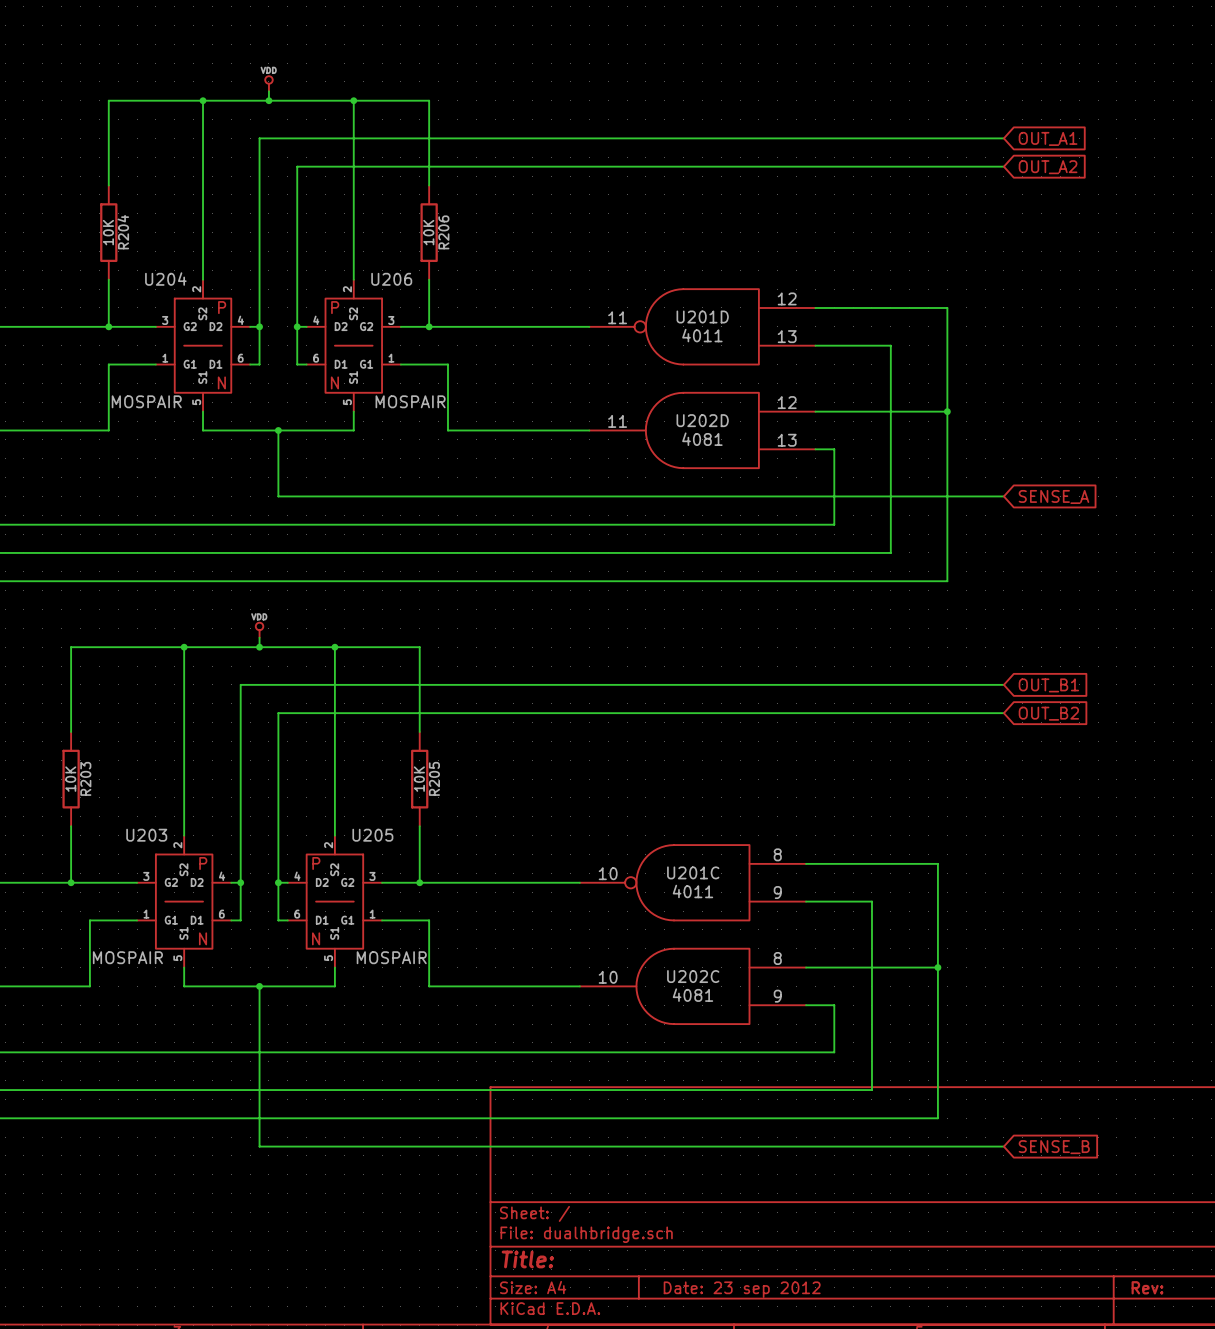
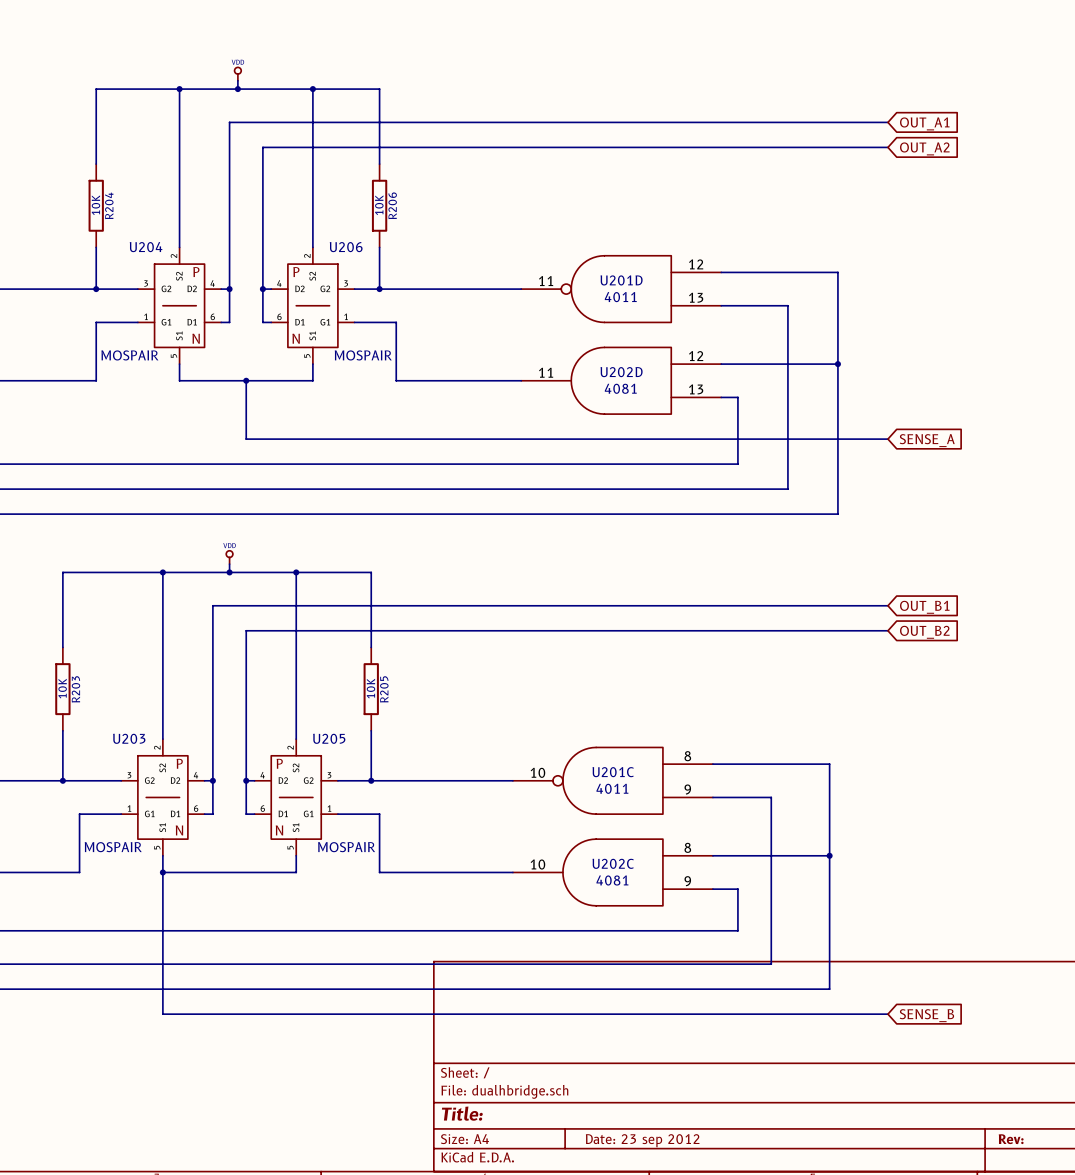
junction: none -> (162, 872)
wire: (259, 986) (259, 1146) -> (162, 872) (162, 1014) (229, 1014)
junction: (259, 986) -> none

